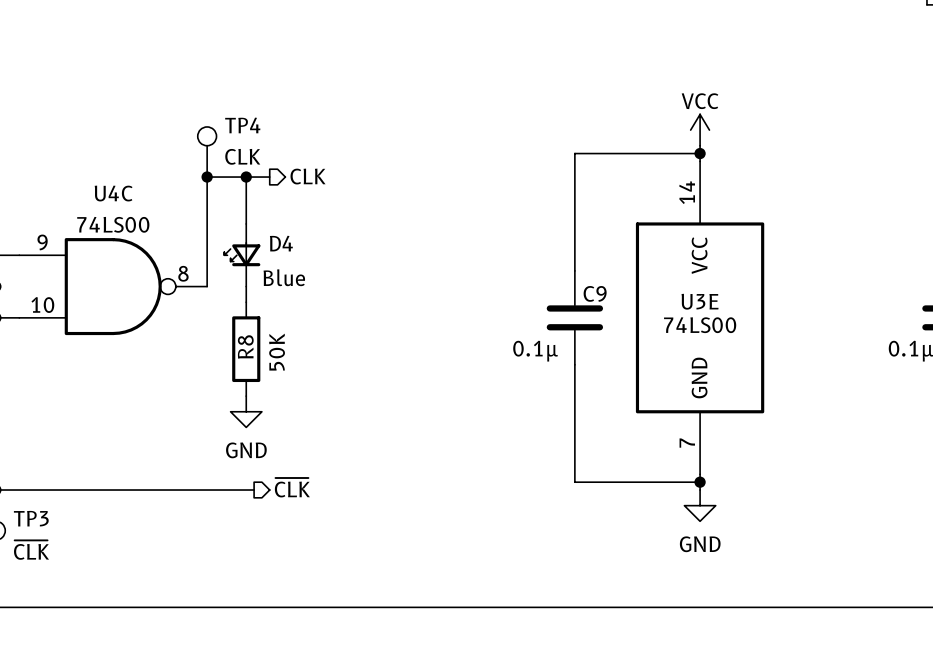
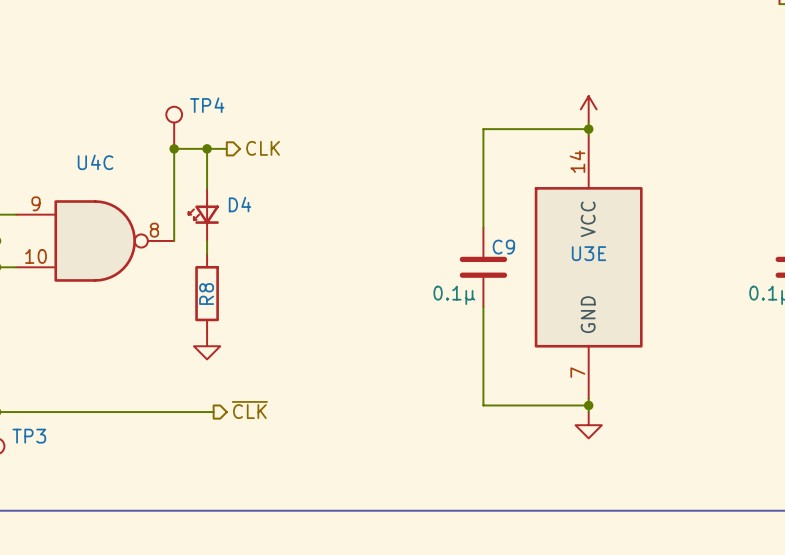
power symbol text: VCC (700, 101) -> none
TP4 value: CLK (242, 156) -> none
U4C value: 74LS00 (113, 224) -> none
D4 value: Blue (284, 277) -> none
U3E value: 74LS00 (700, 325) -> none
R8 value: 50K (277, 352) -> none
power symbol text: GND (246, 450) -> none
power symbol text: GND (700, 544) -> none
TP3 value: ~{CLK} (31, 550) -> none

